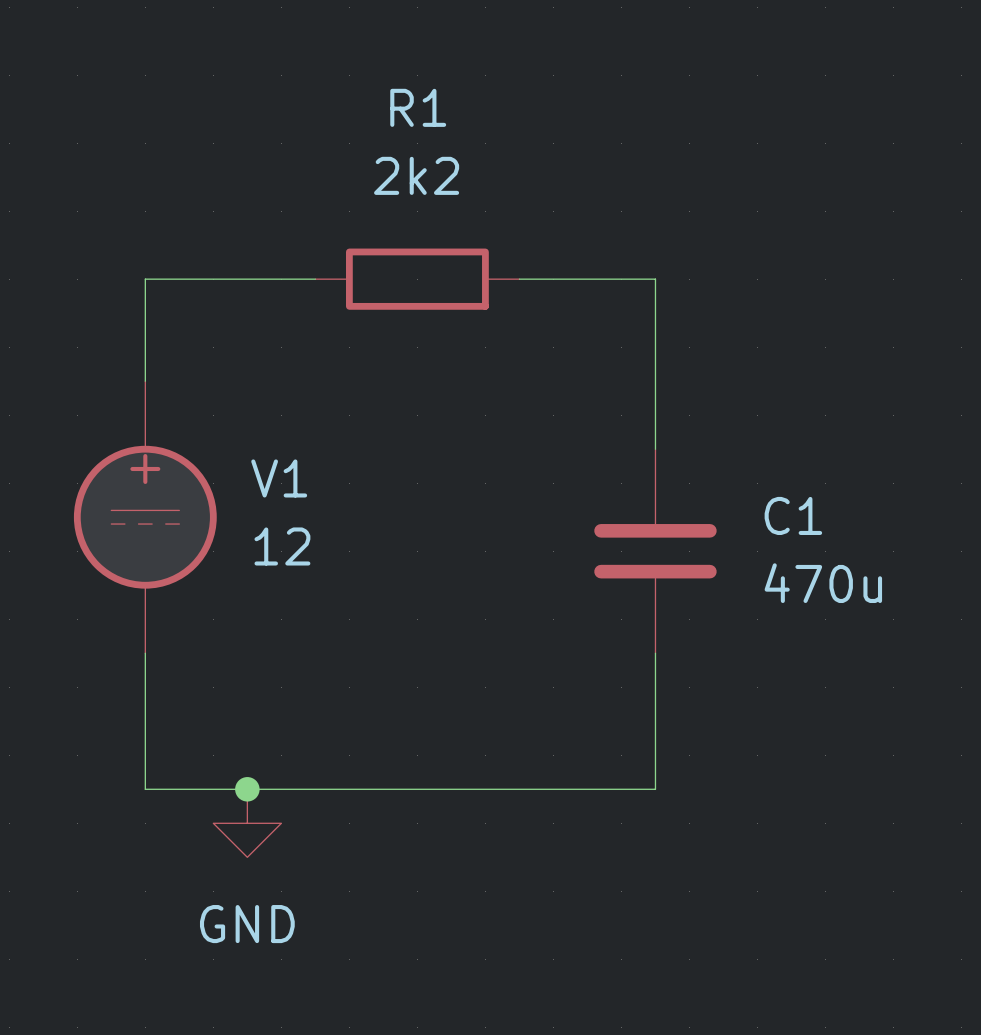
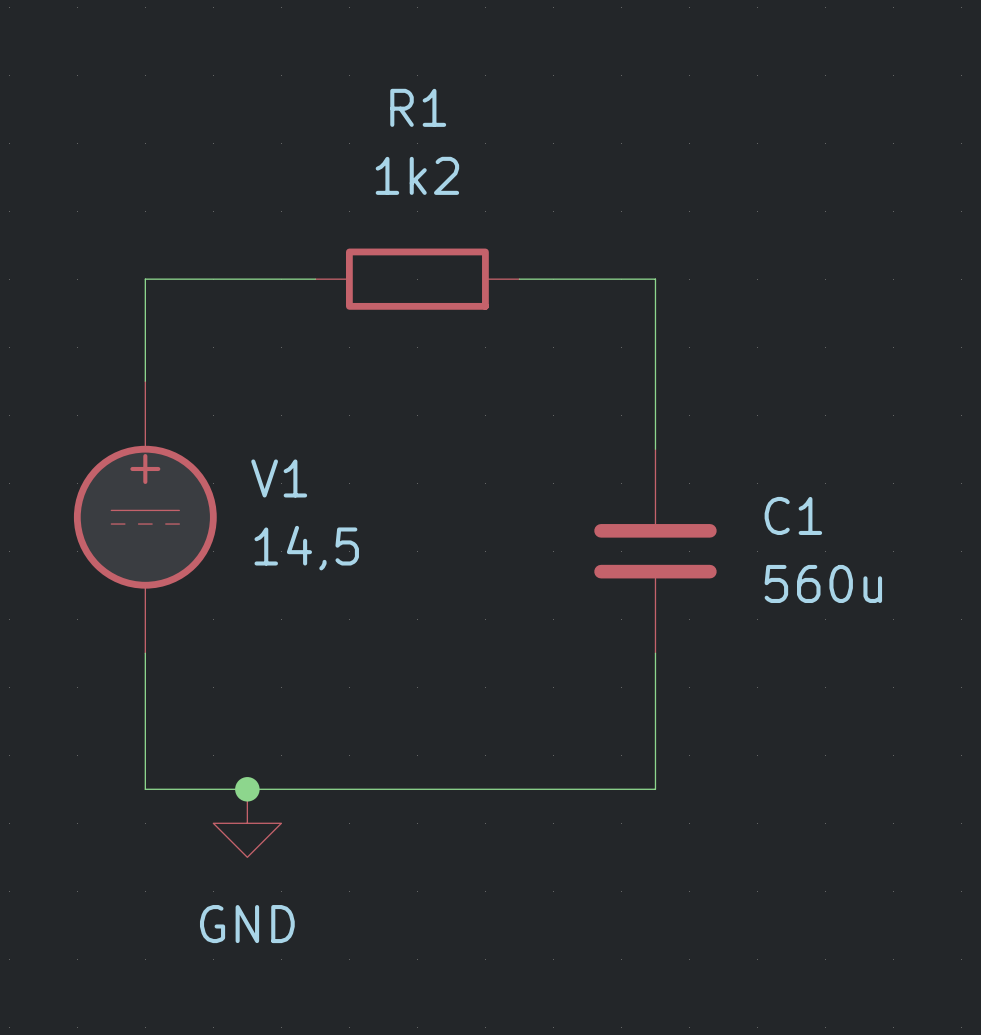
R1 value: 2k2 (416, 175) -> 1k2 (417, 175)
V1 value: 12 (282, 546) -> 14,5 (306, 548)
C1 value: 470u (823, 583) -> 560u (823, 583)

